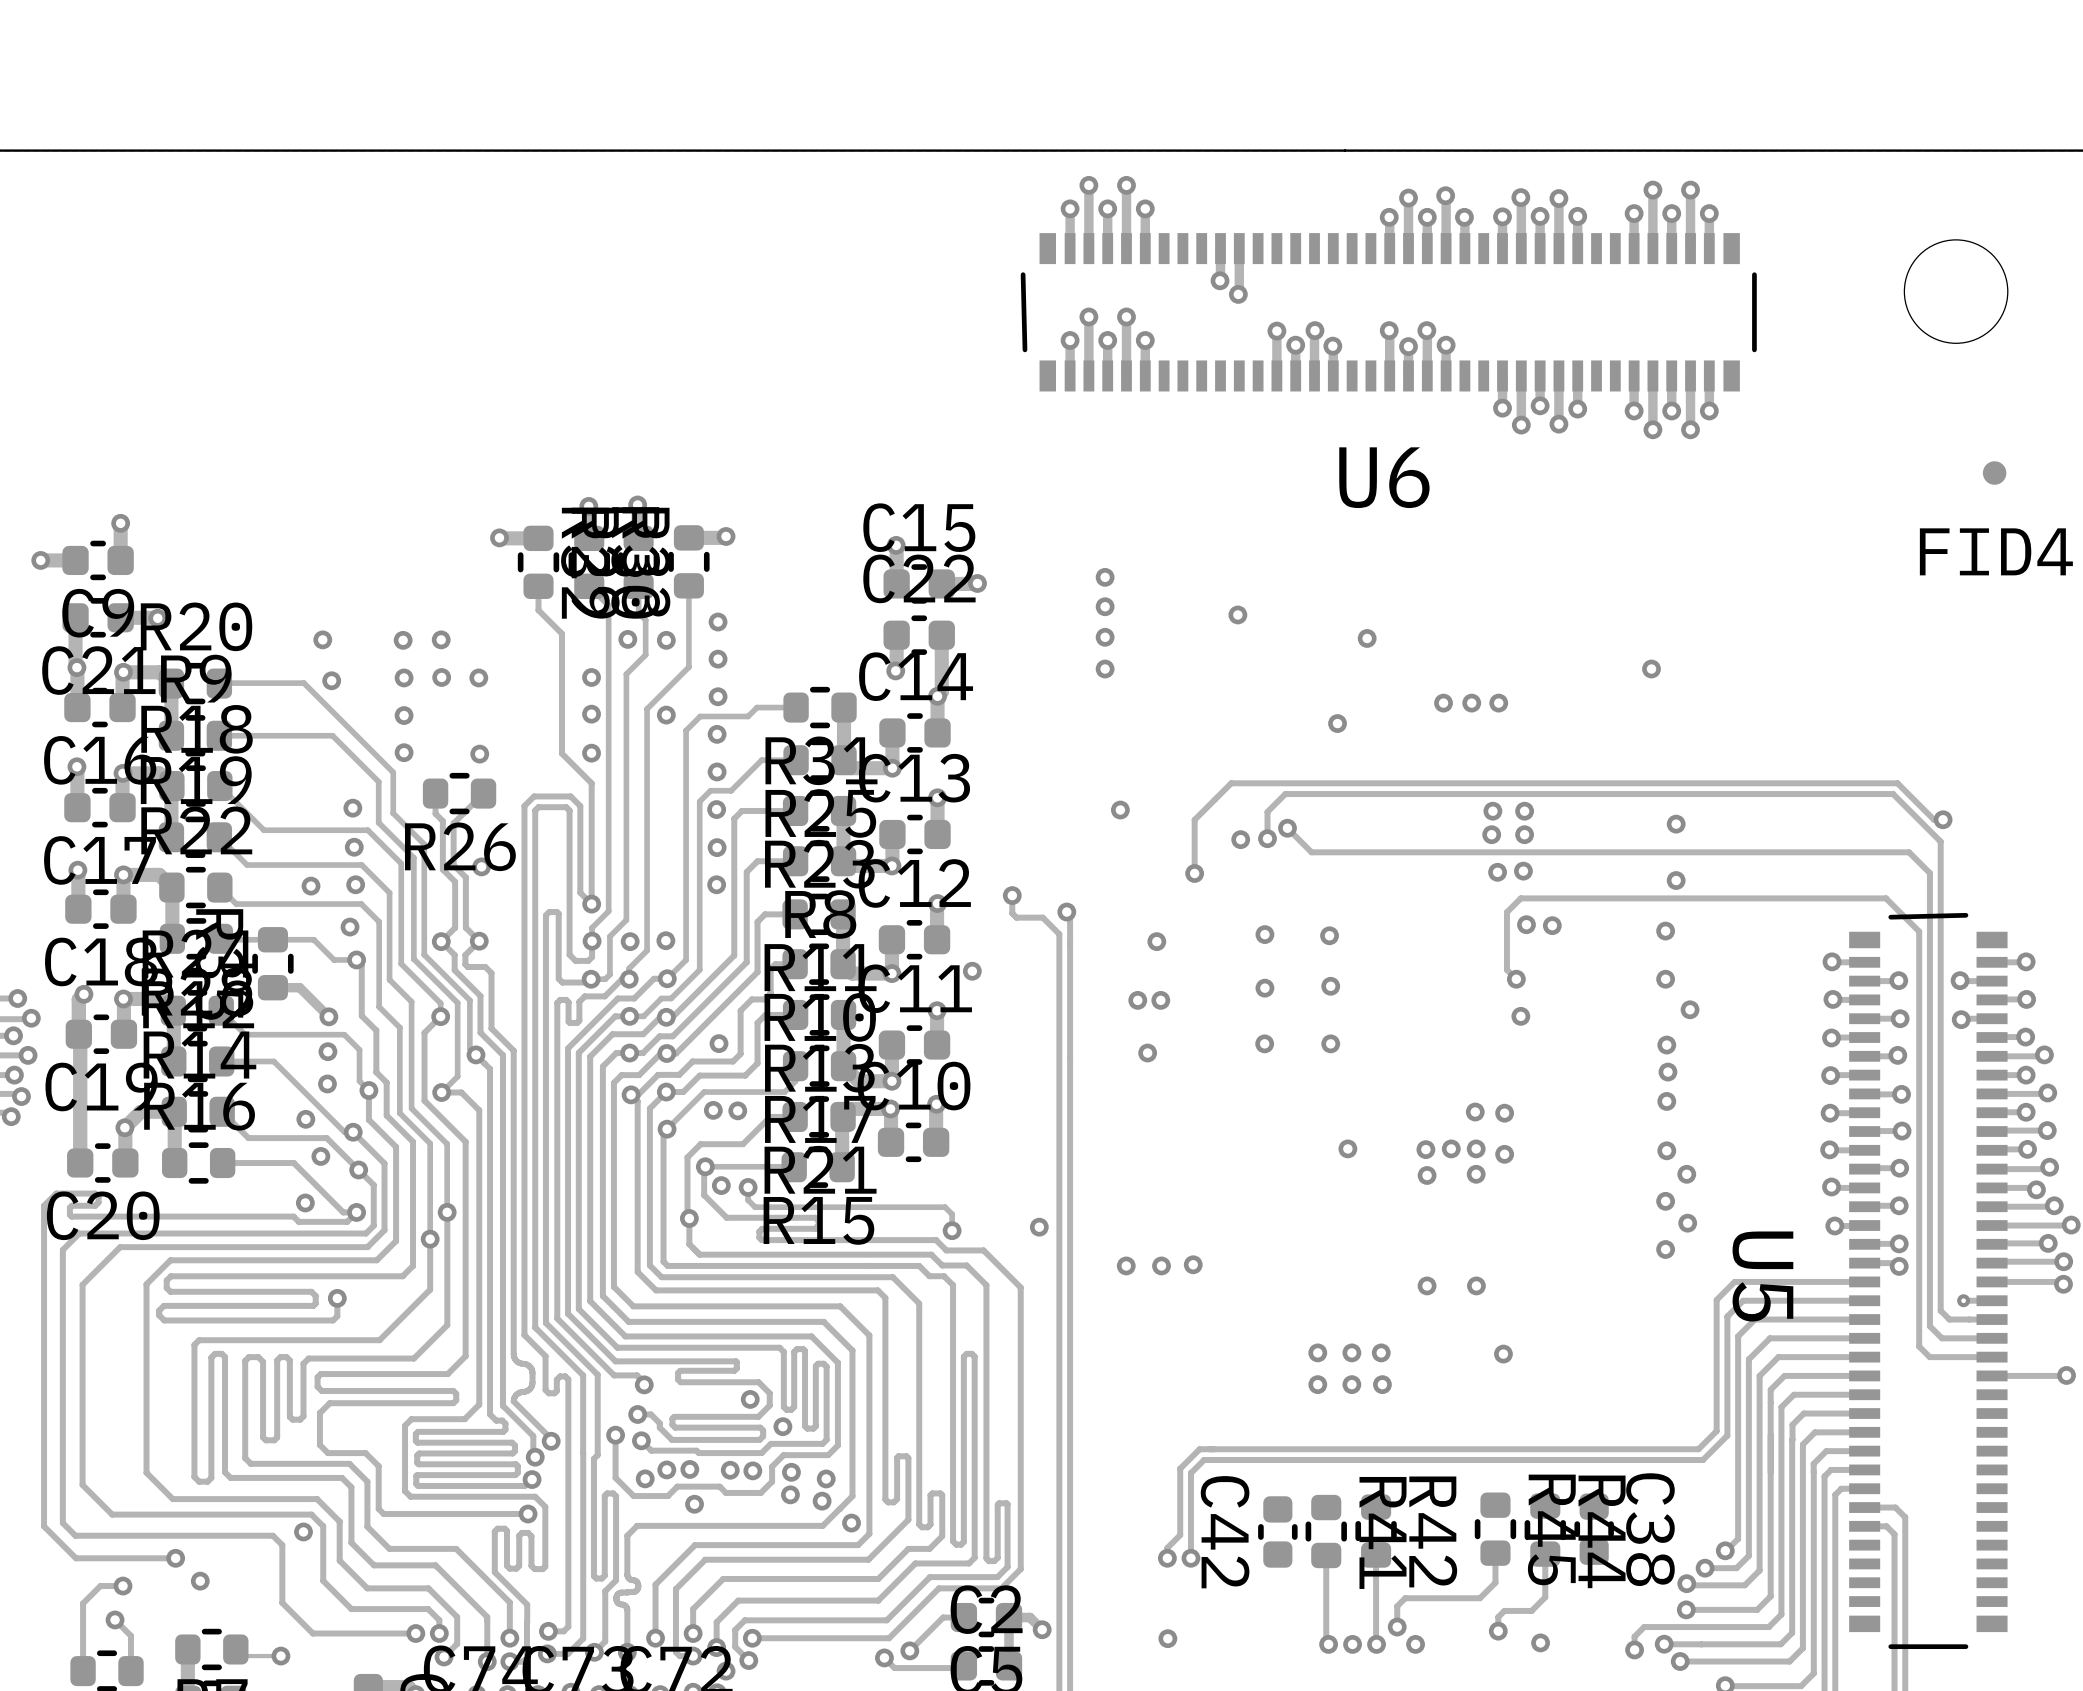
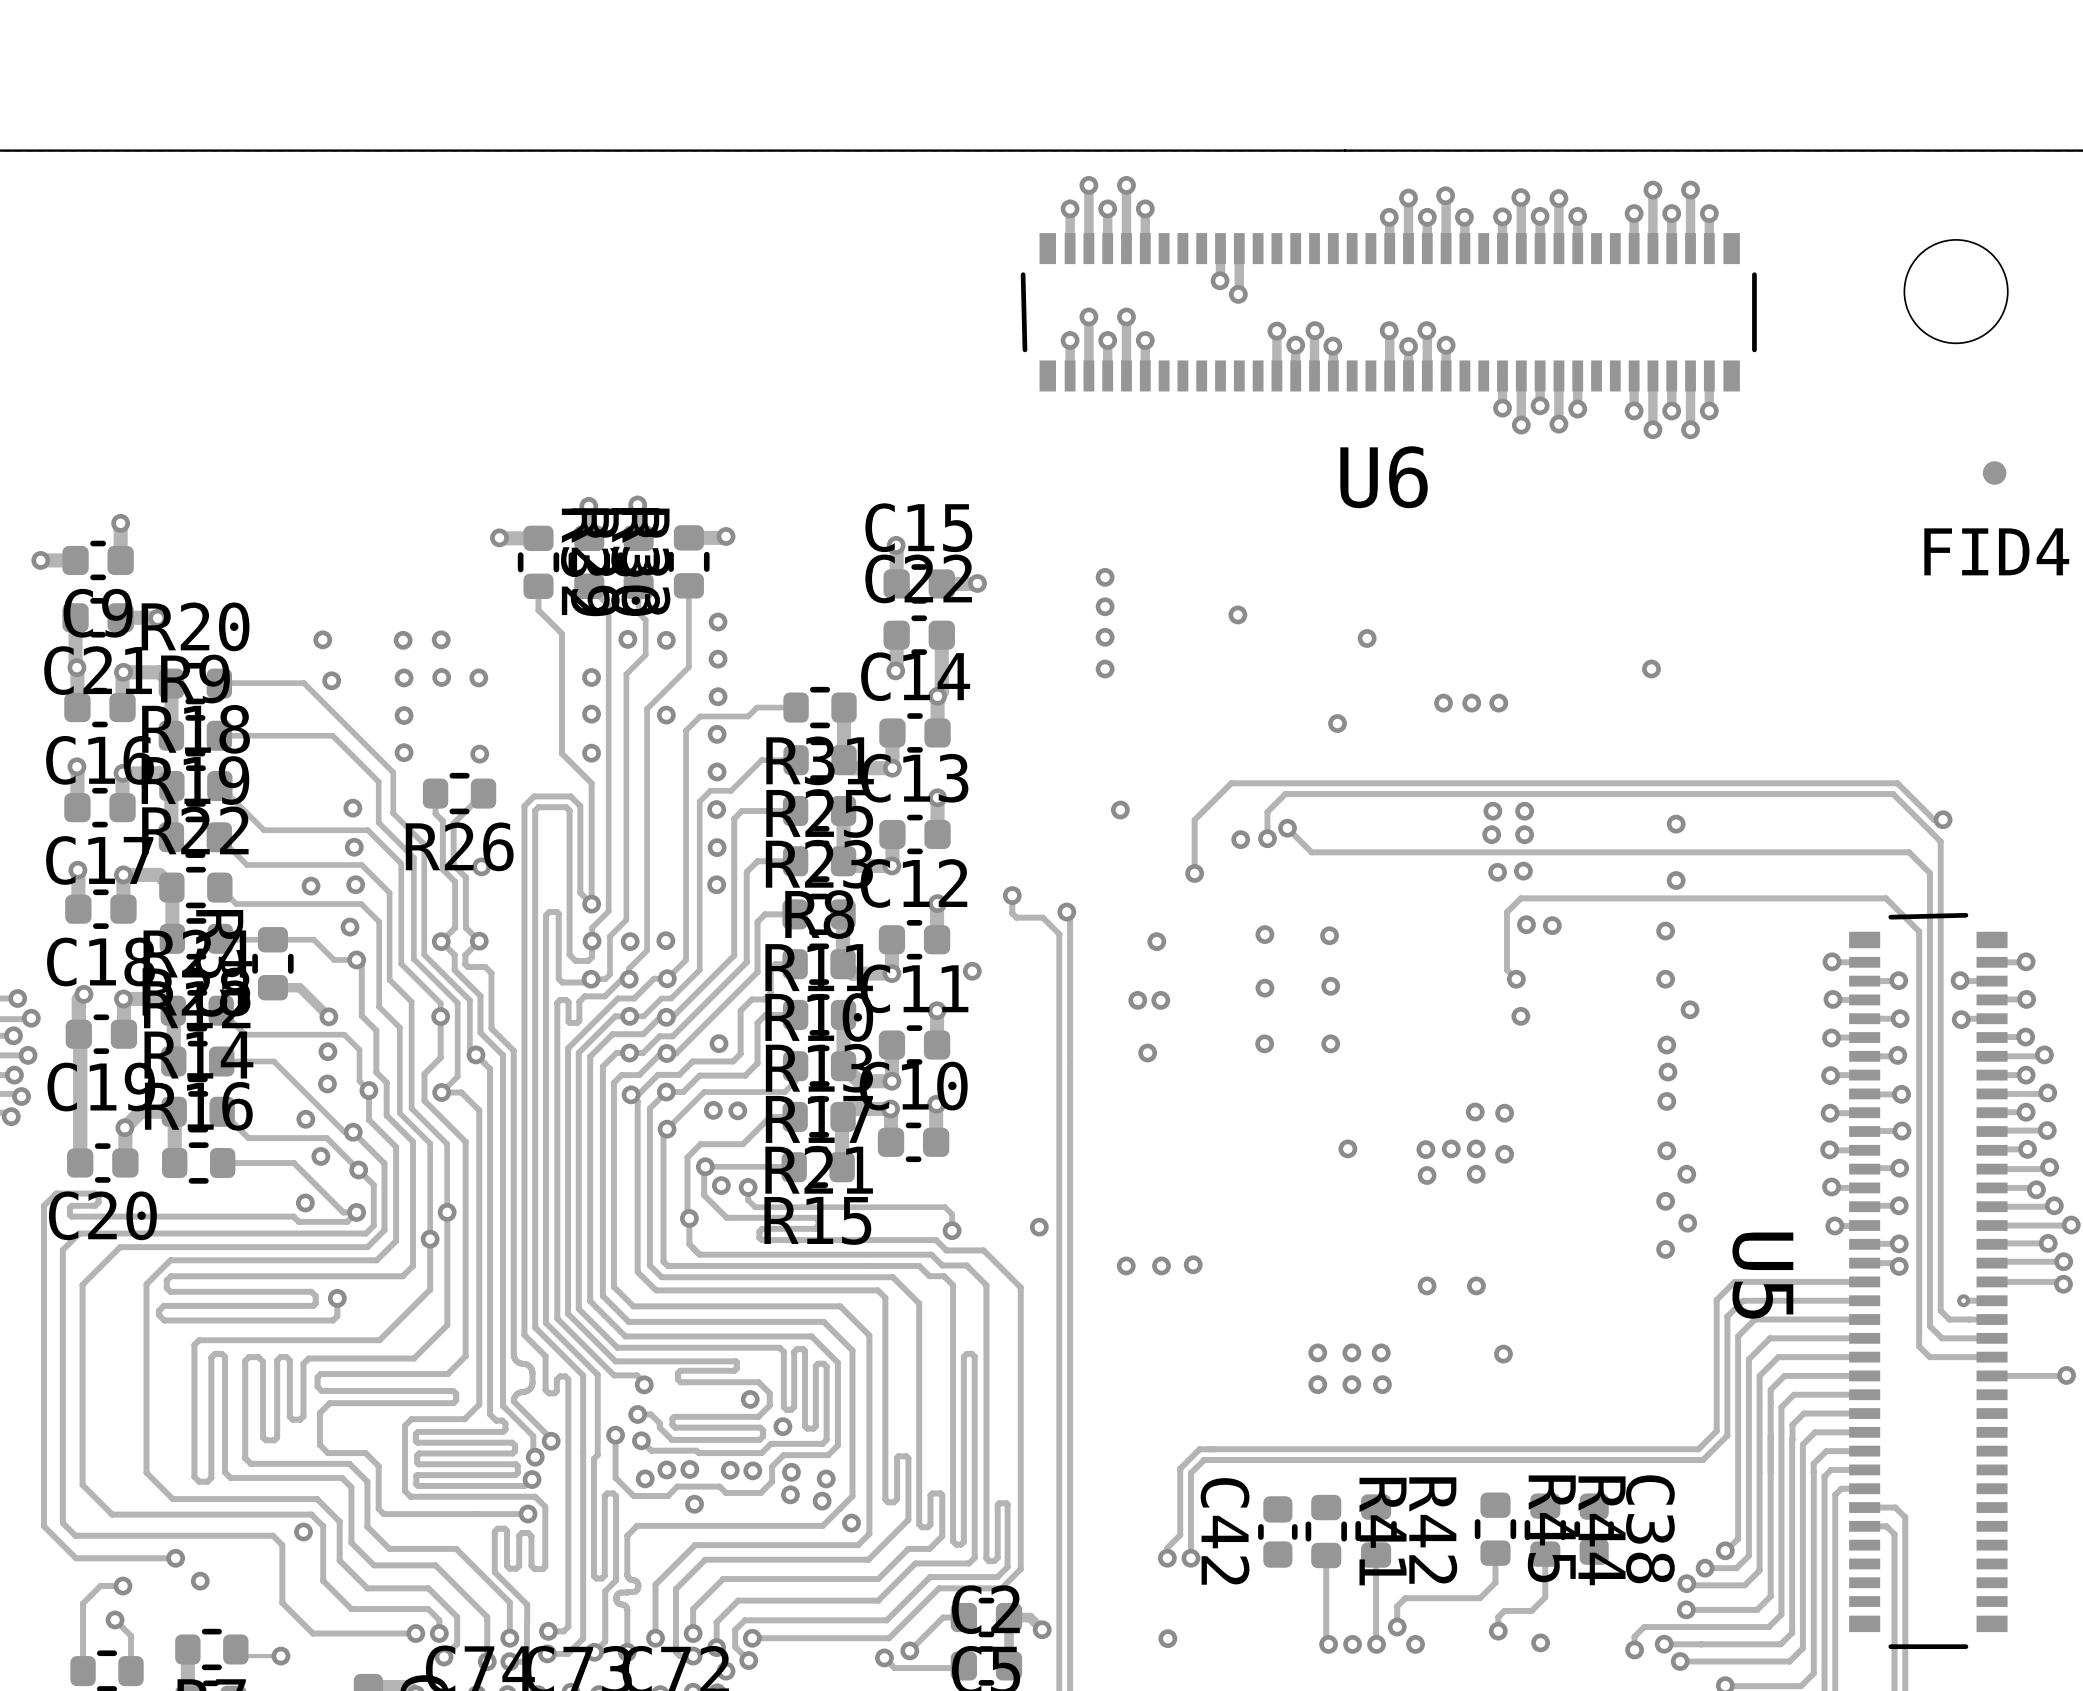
track: (440, 1016) (424, 1032) (424, 1073) -> (440, 1016) (440, 1057) (424, 1073)

